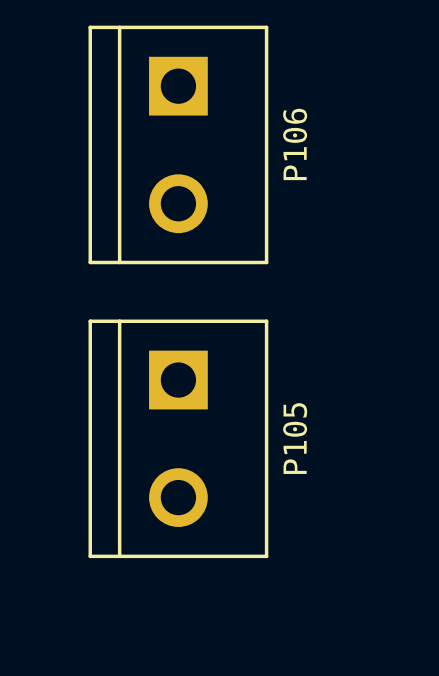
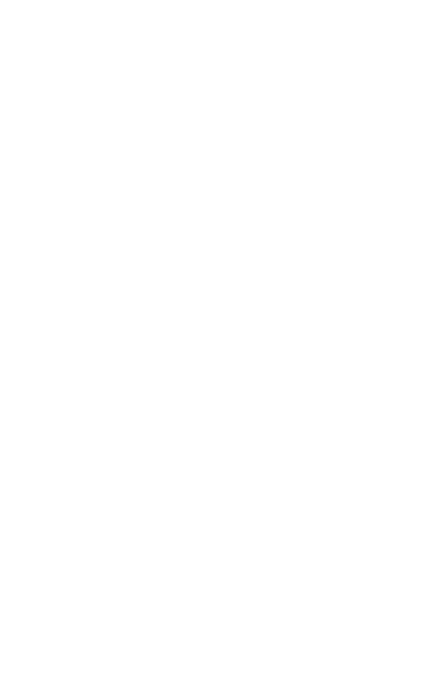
P106: (178, 144) -> none
P105: (178, 438) -> none

